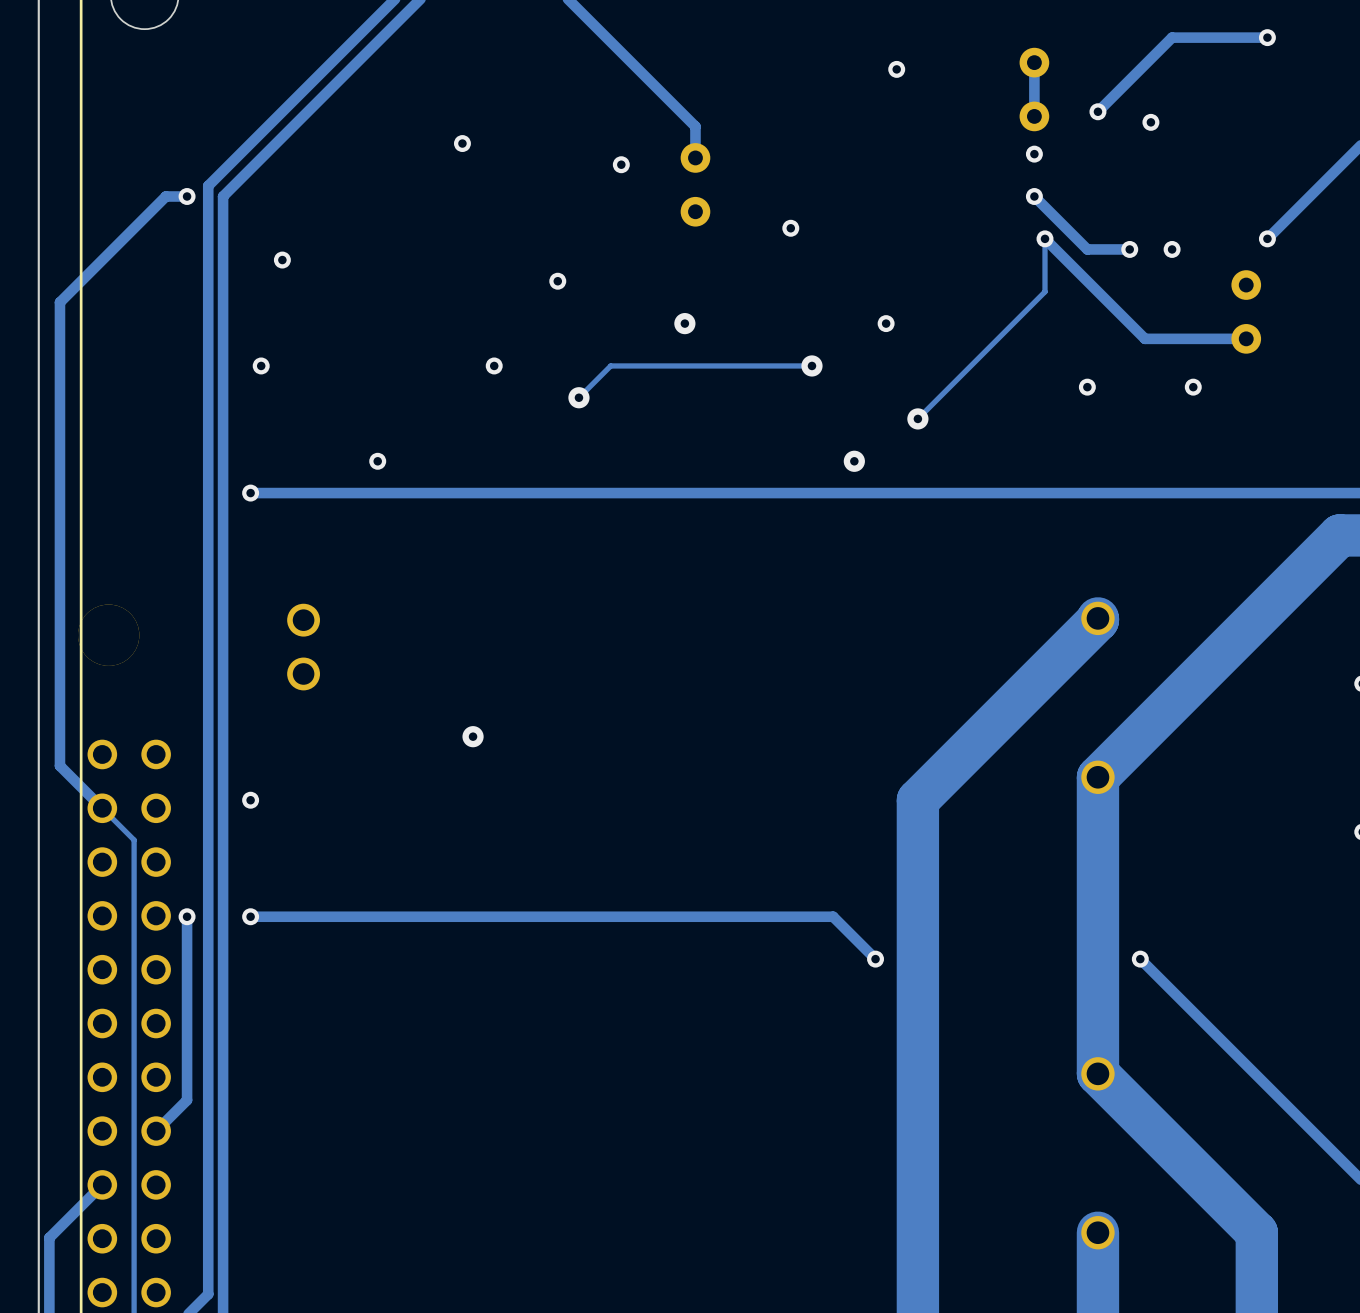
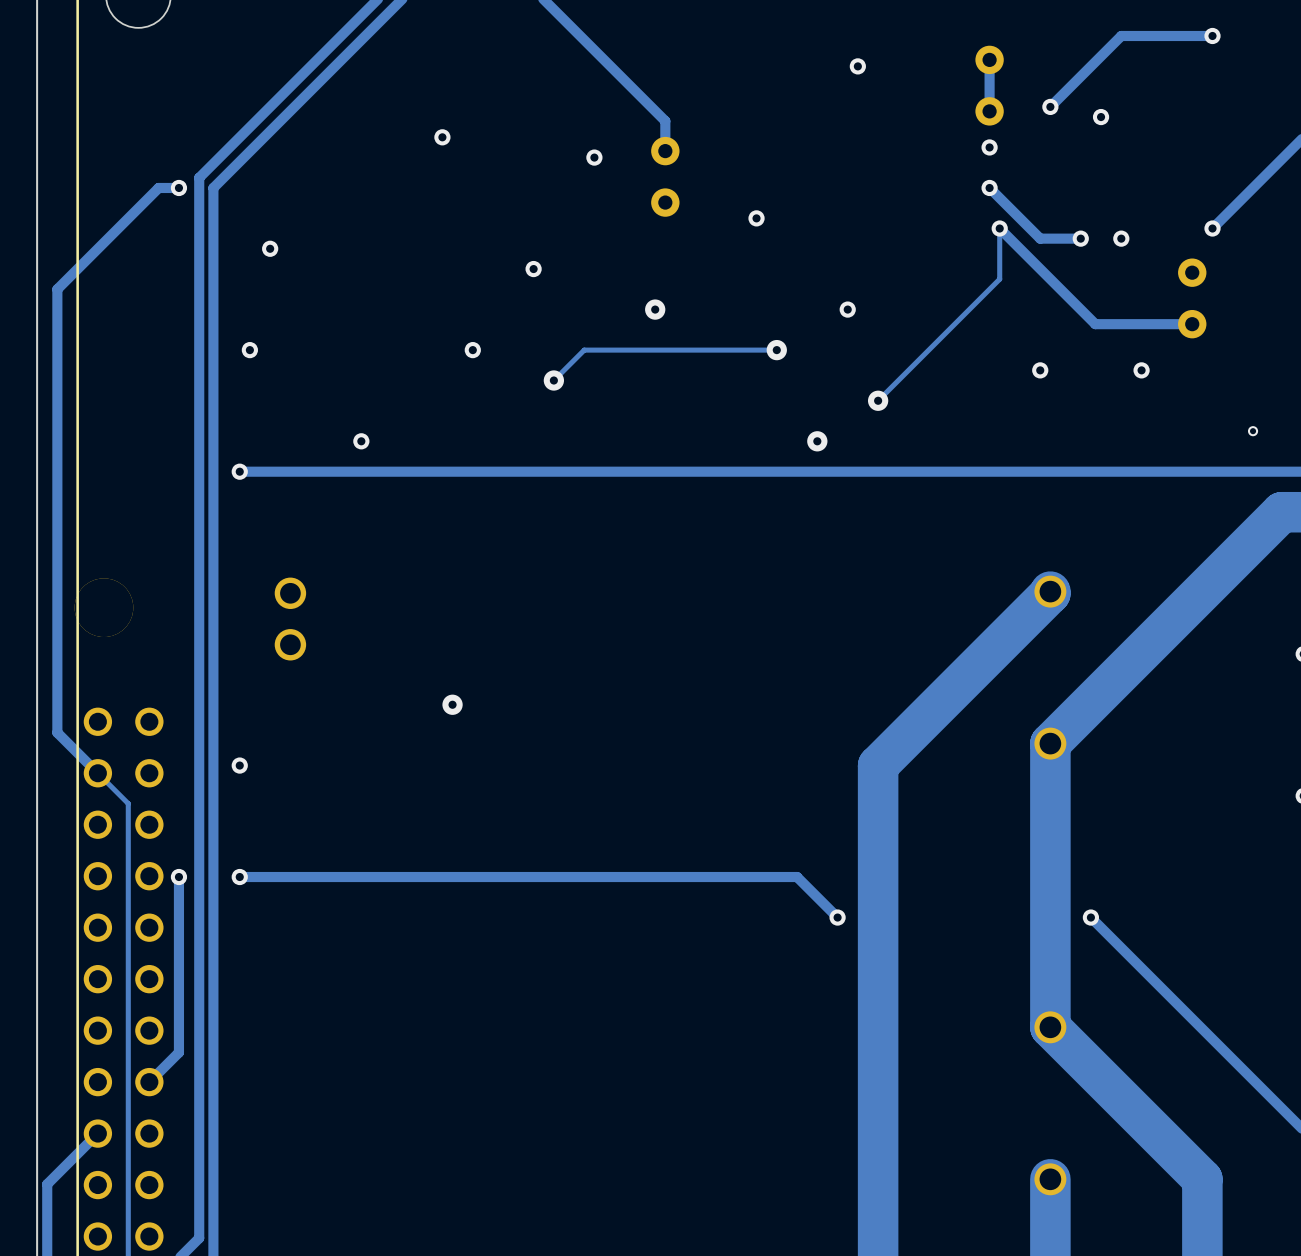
via: none -> (1253, 431)

